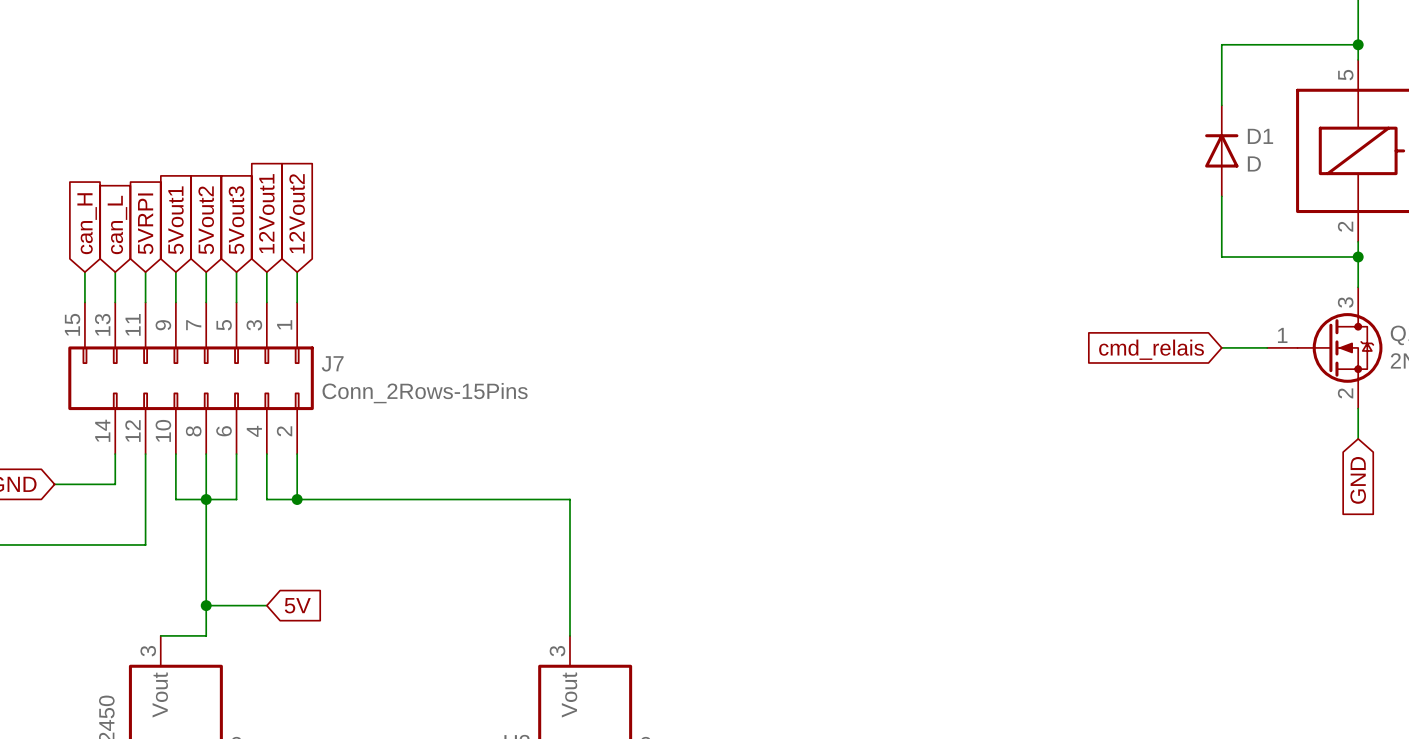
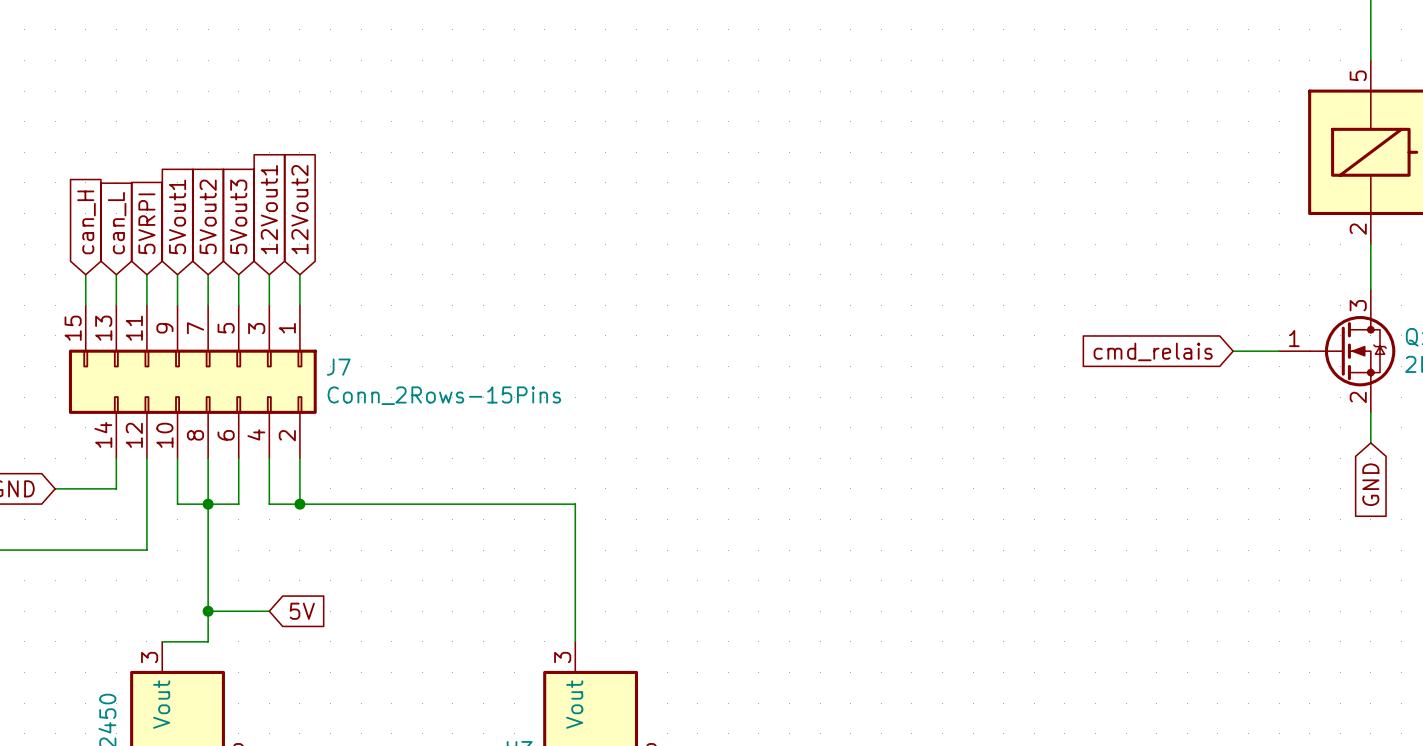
wire: (1358, 44) (1221, 44) (1221, 105) -> none
junction: (1358, 44) -> none
D1: D (1221, 150) -> none
wire: (1221, 196) (1221, 256) (1358, 256) -> none
junction: (1358, 256) -> none

